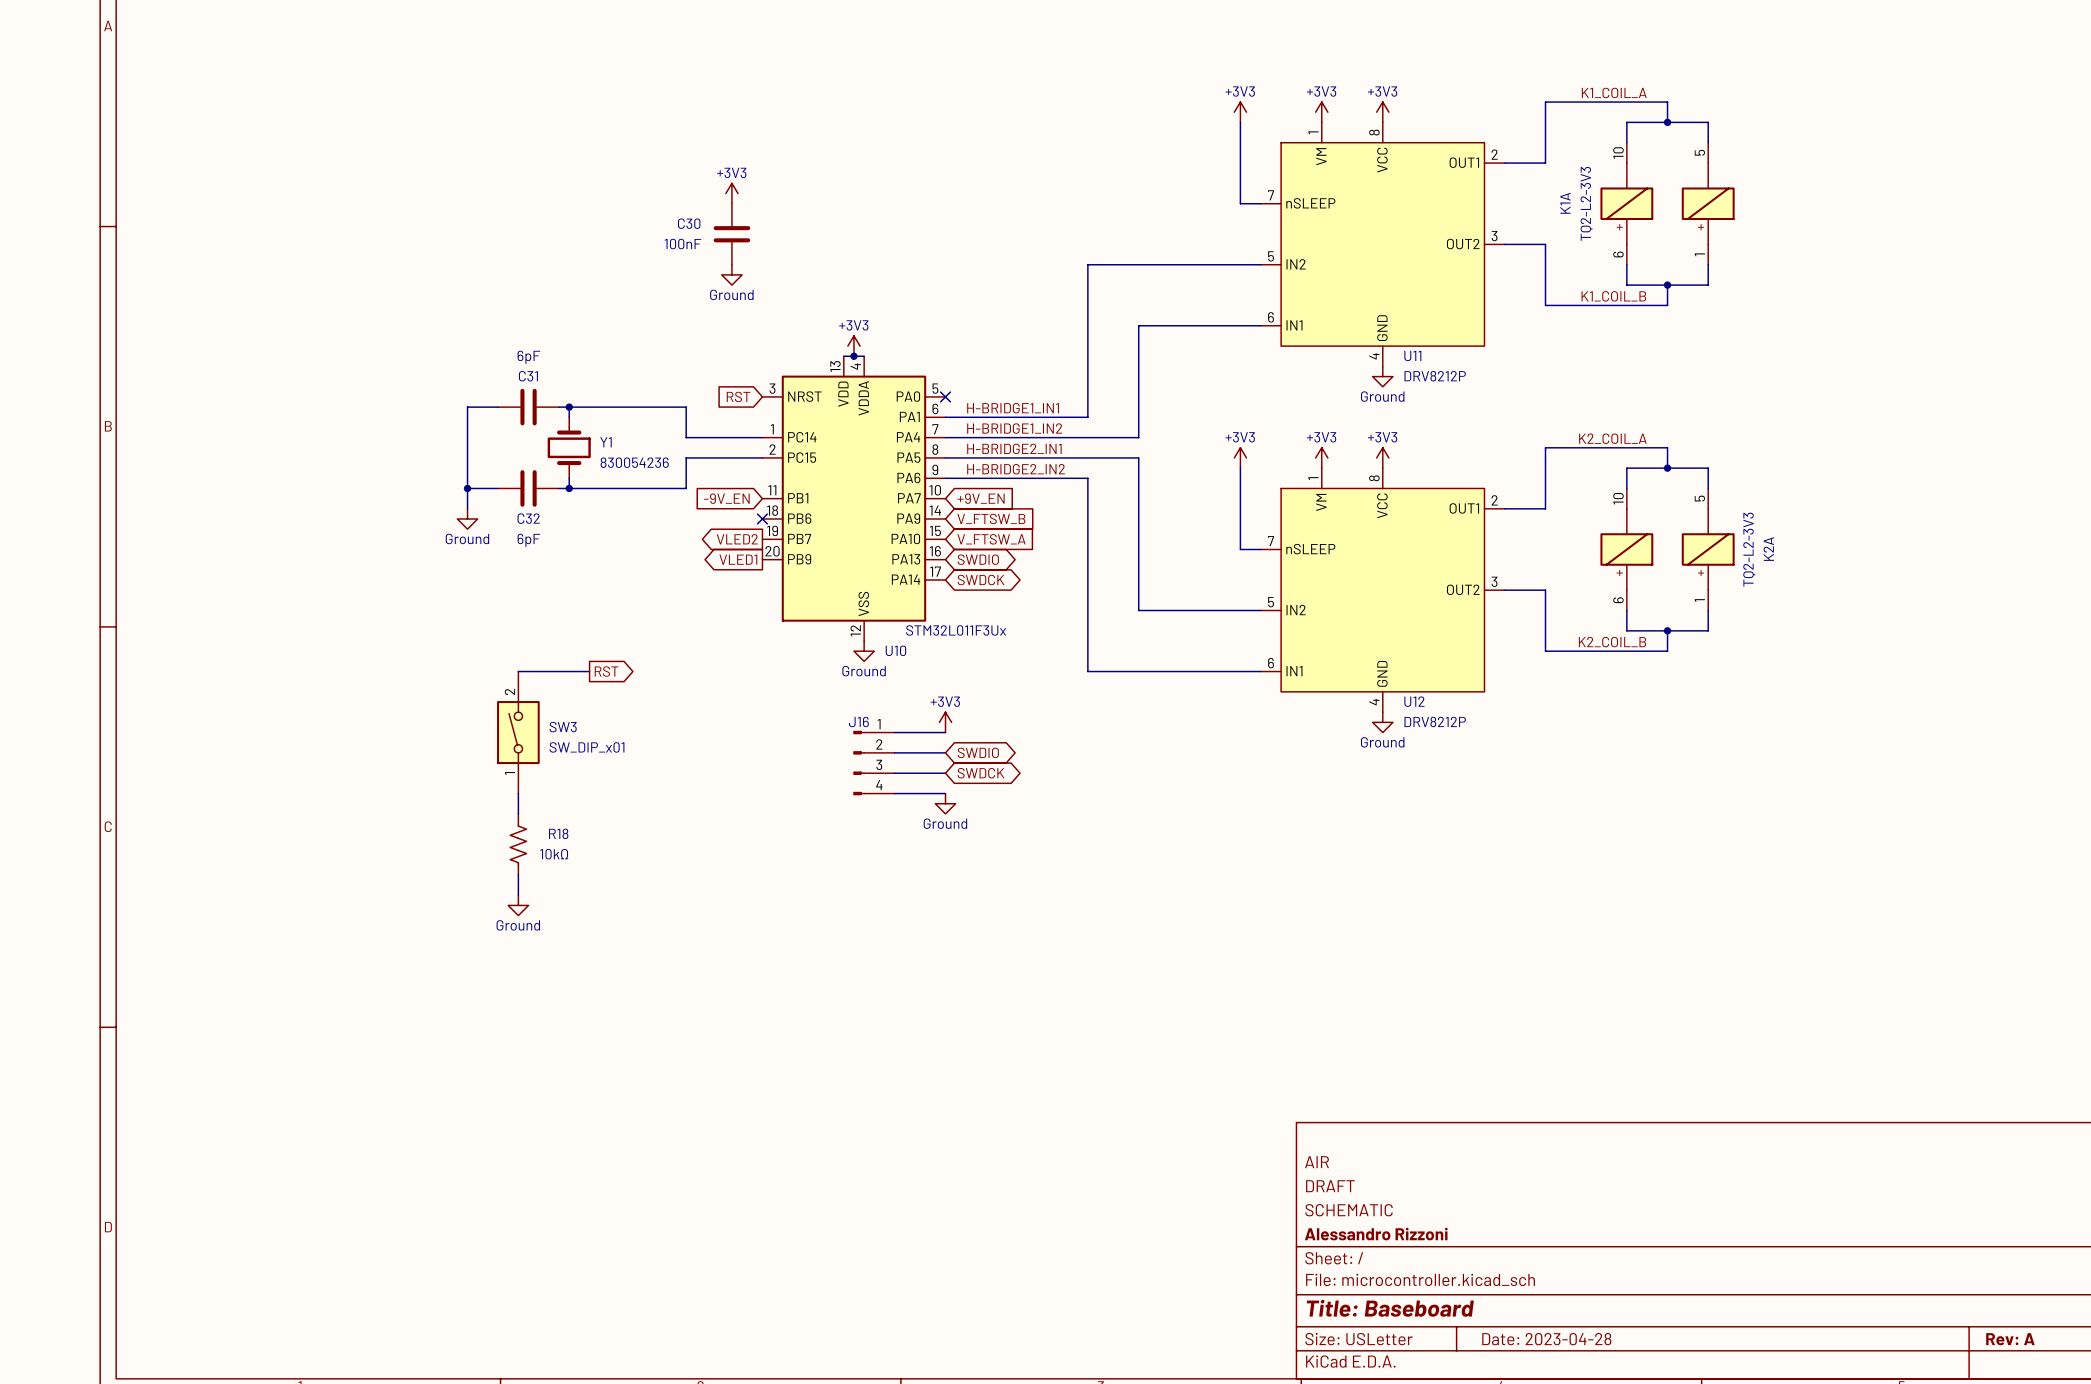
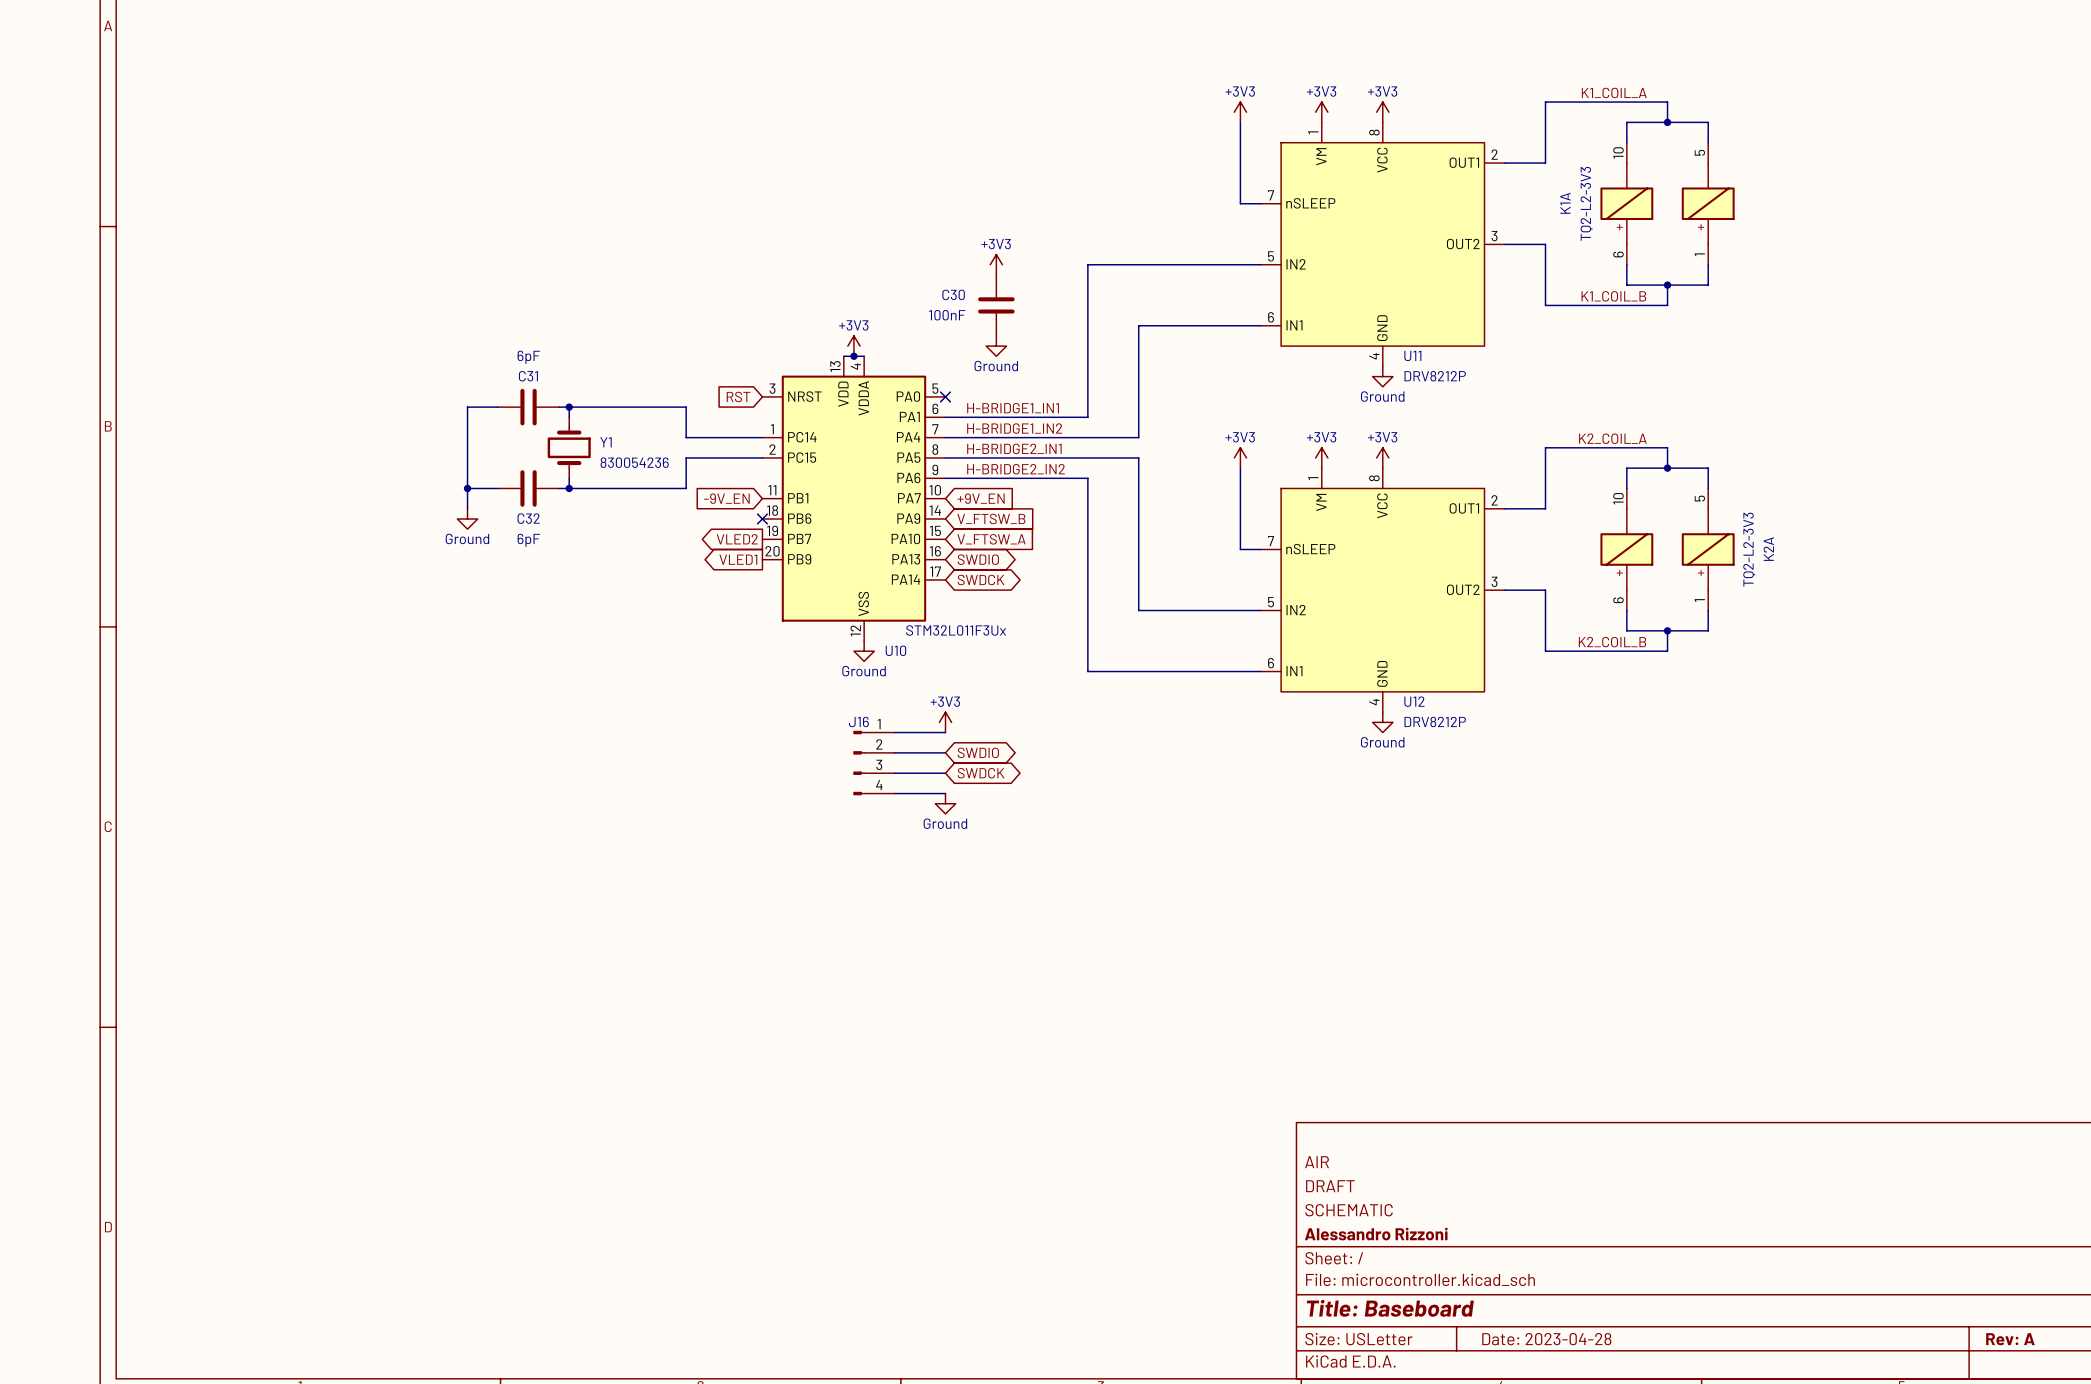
power symbol: +3V3 (731, 193) -> none
C30 position: (731, 234) -> (996, 305)
power symbol: none -> +3V3 (996, 264)
power symbol: Ground (731, 274) -> none
power symbol: none -> Ground (996, 346)
wire: (518, 671) (589, 671) -> none
global label: RST (606, 671) -> none
SW3: SW_DIP_x01 (518, 732) -> none
wire: (518, 793) (518, 813) -> none
R18: 10kΩ (518, 844) -> none
wire: (518, 874) (518, 895) -> none
power symbol: Ground (518, 905) -> none

